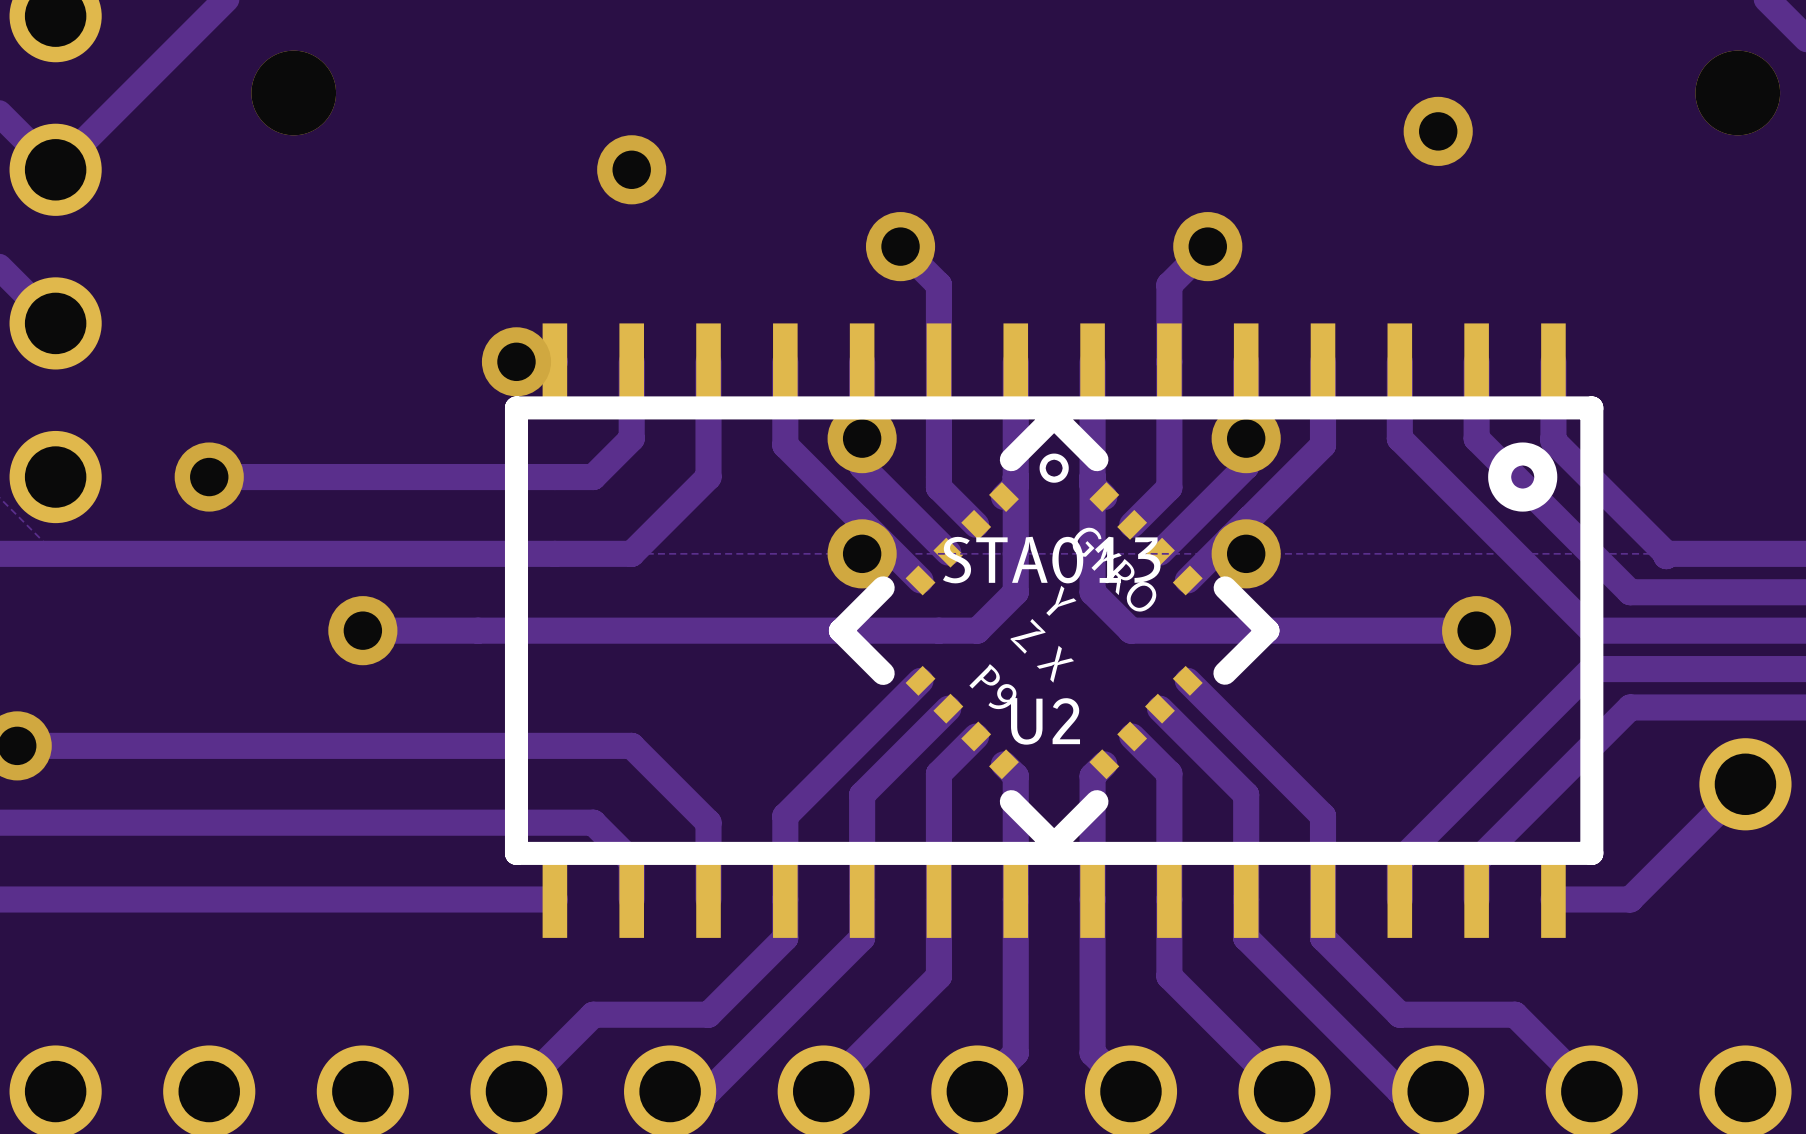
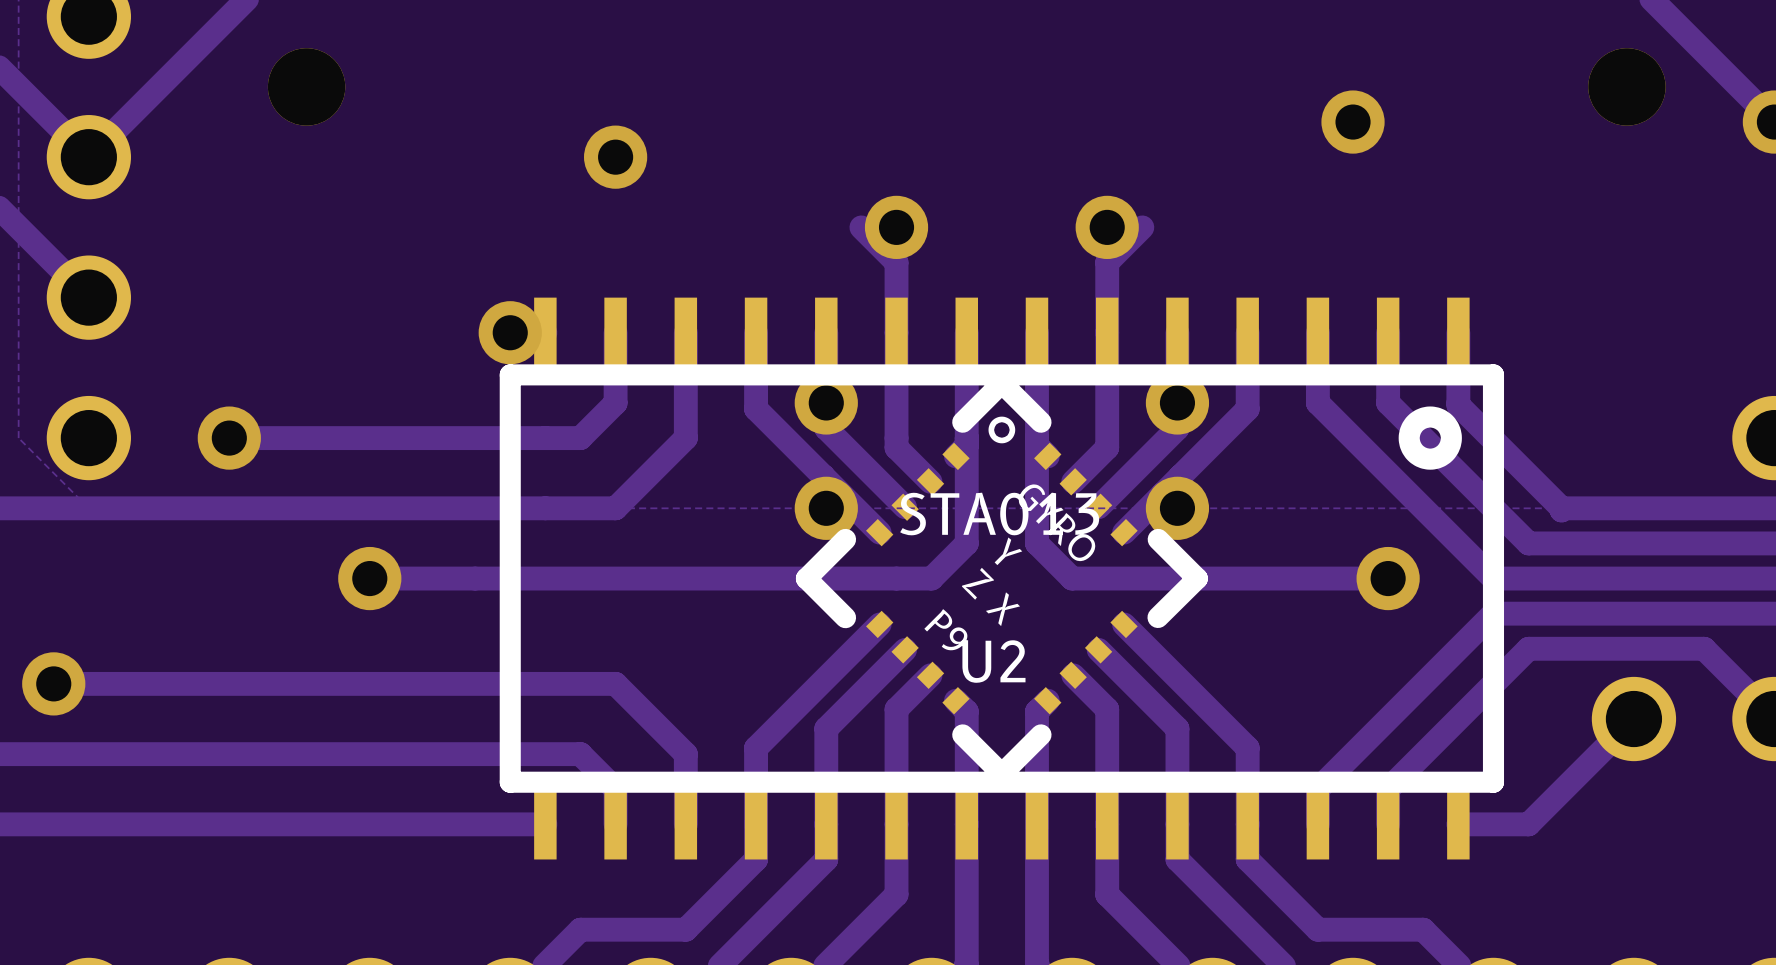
via position: (900, 246) -> (896, 227)
via position: (1207, 246) -> (1107, 227)

